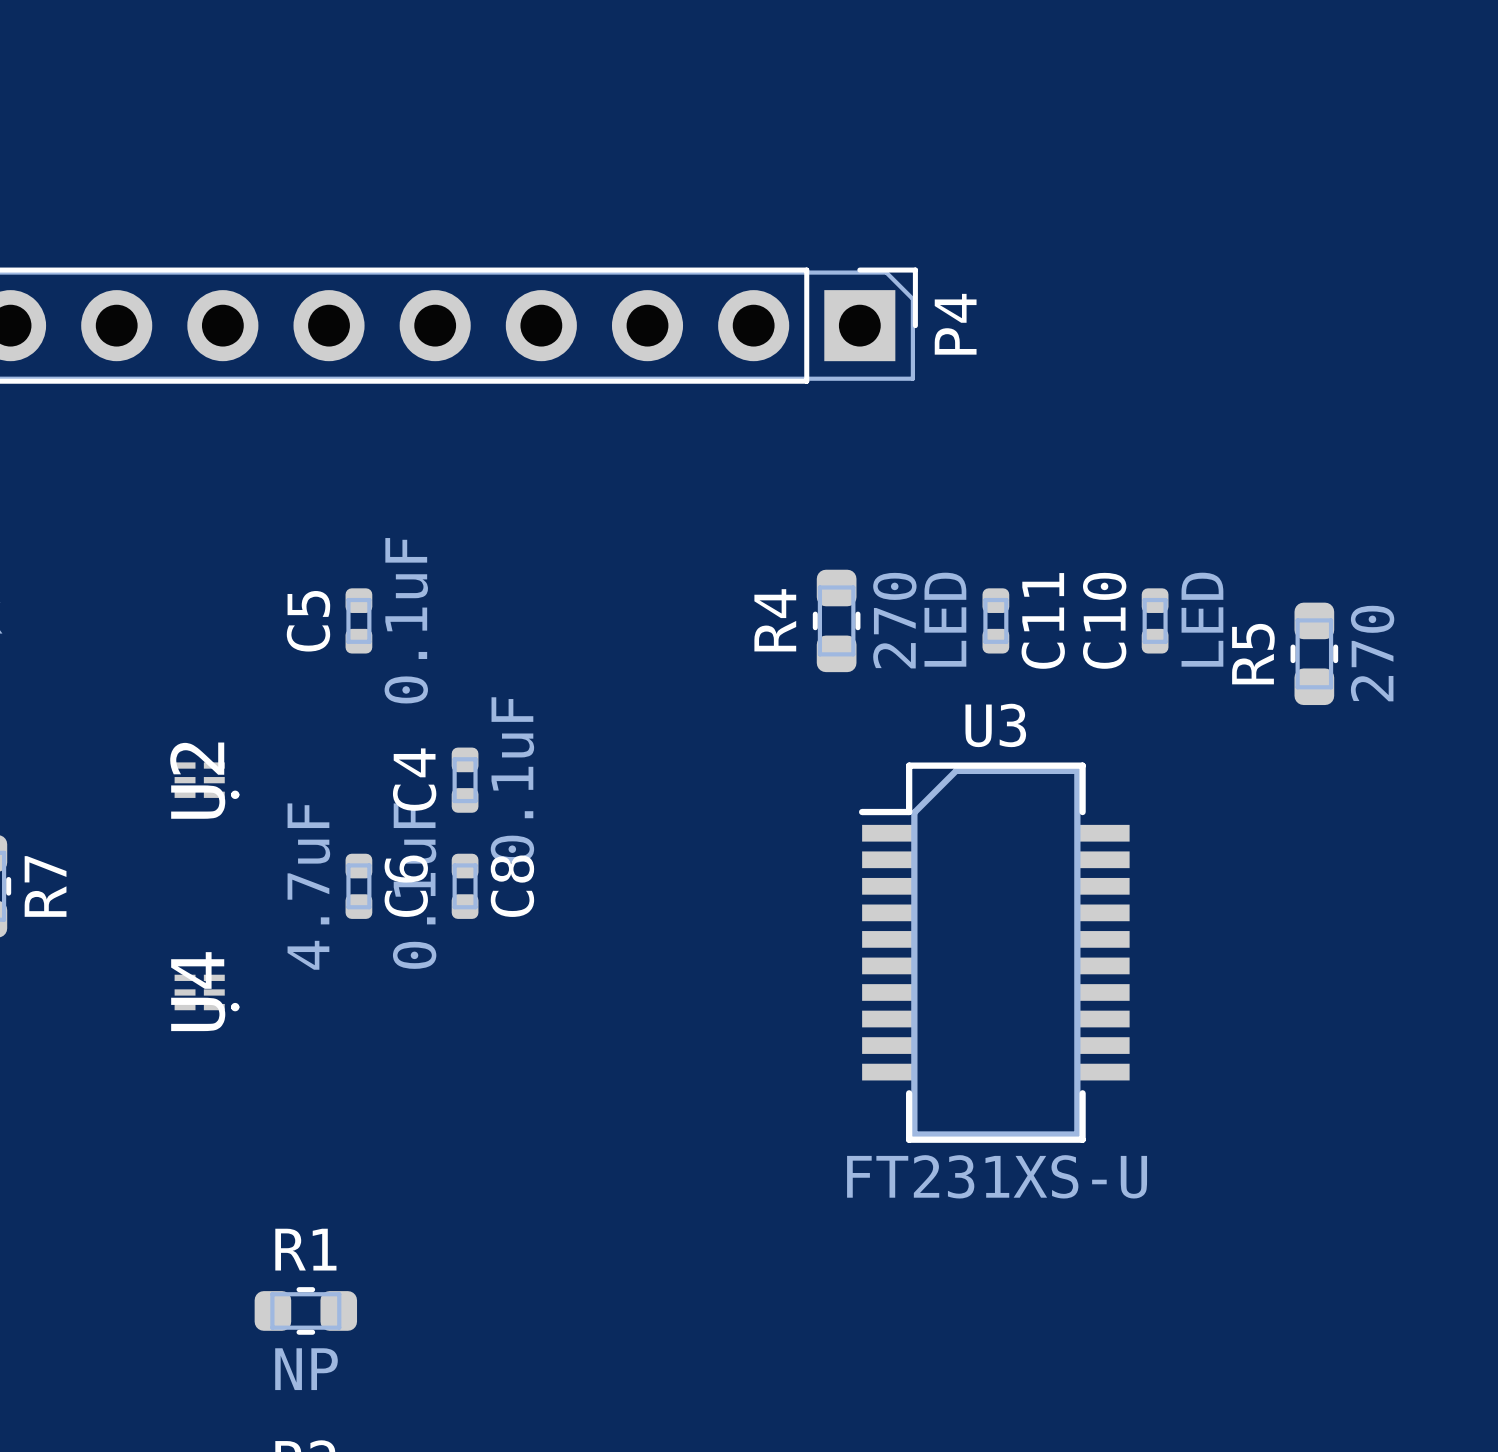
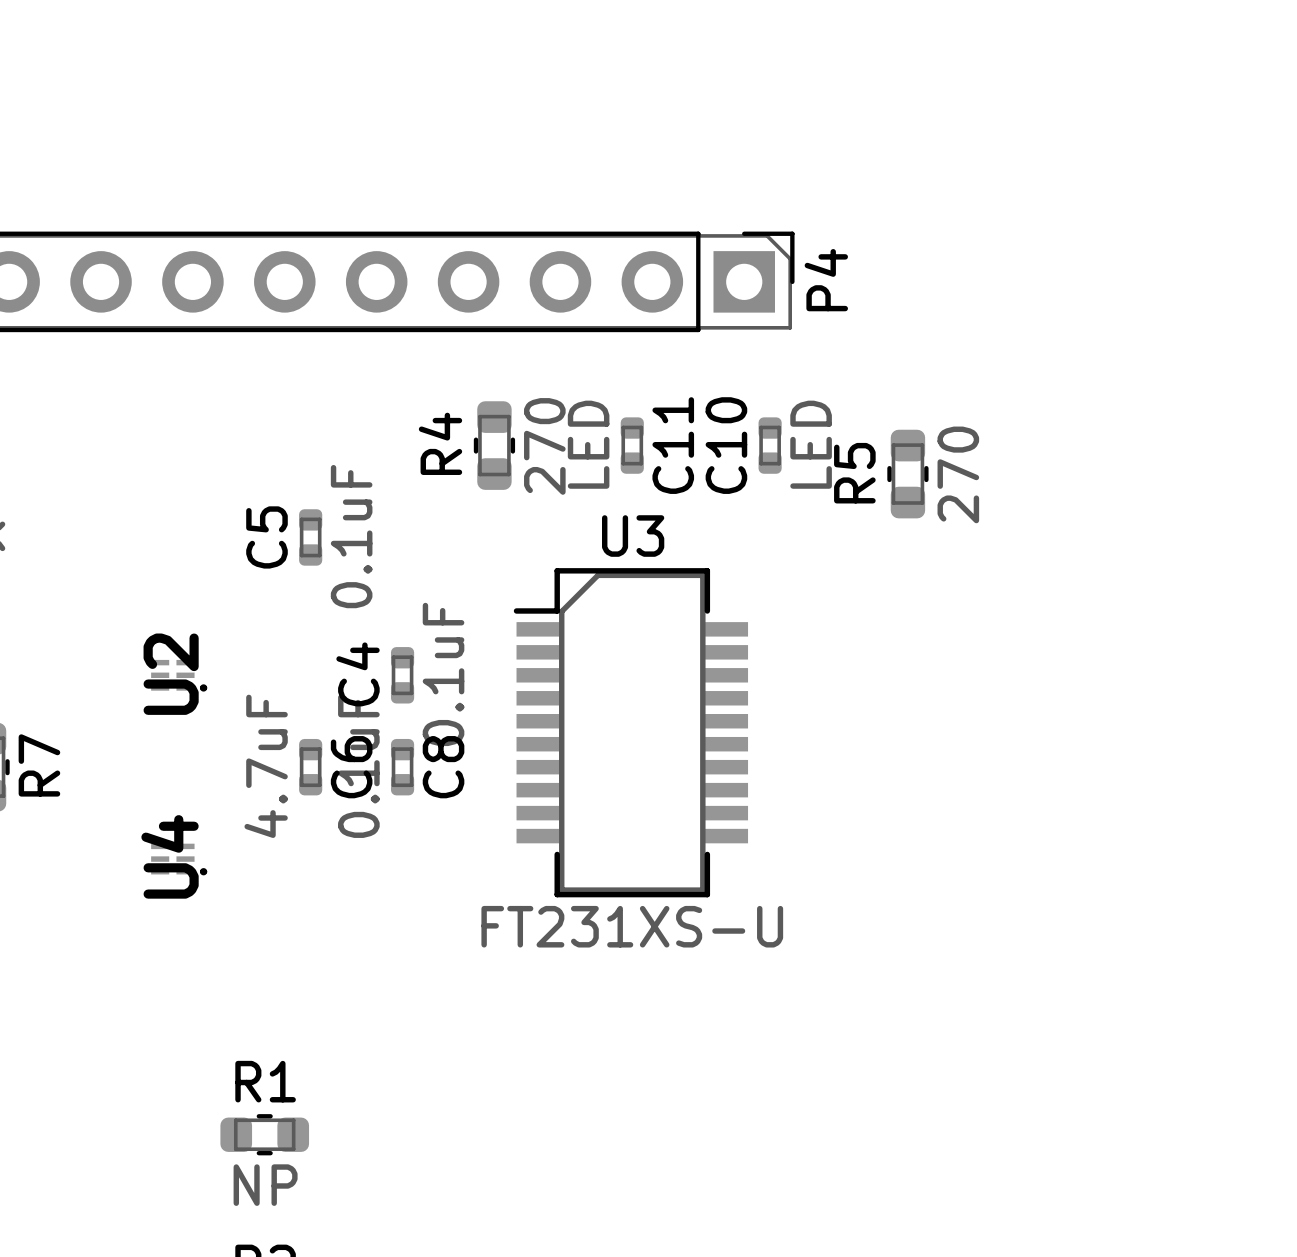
R4 position: (836, 620) -> (494, 445)
C11 position: (995, 620) -> (632, 445)
C10 position: (1155, 620) -> (770, 445)
R5 position: (1314, 653) -> (907, 474)
U3 position: (994, 952) -> (630, 732)

